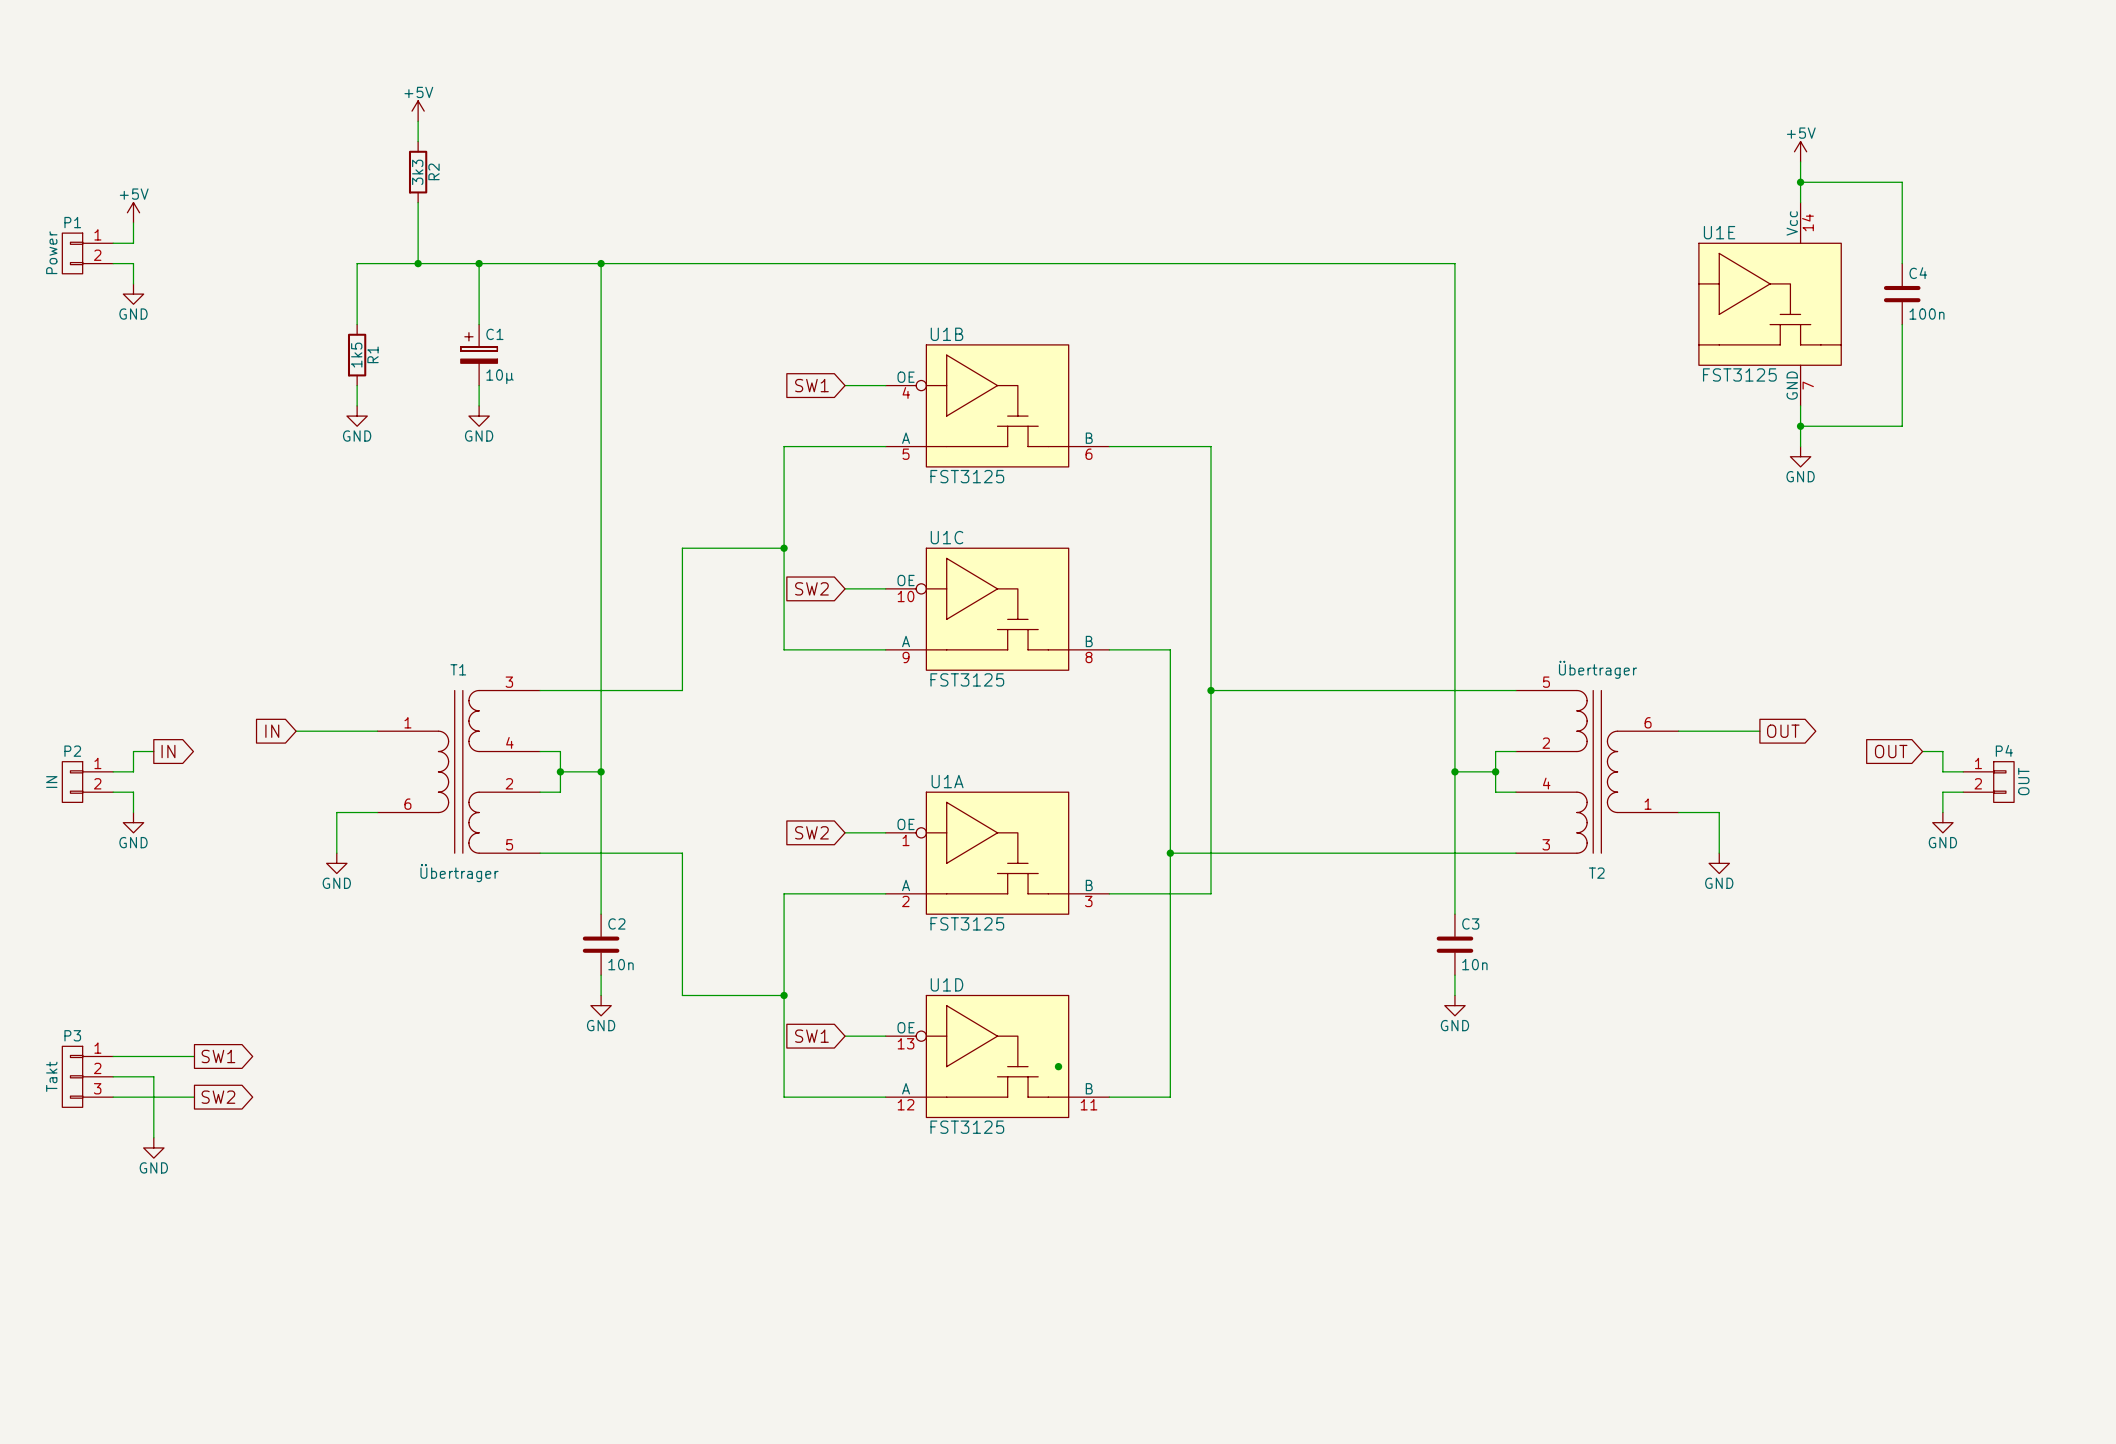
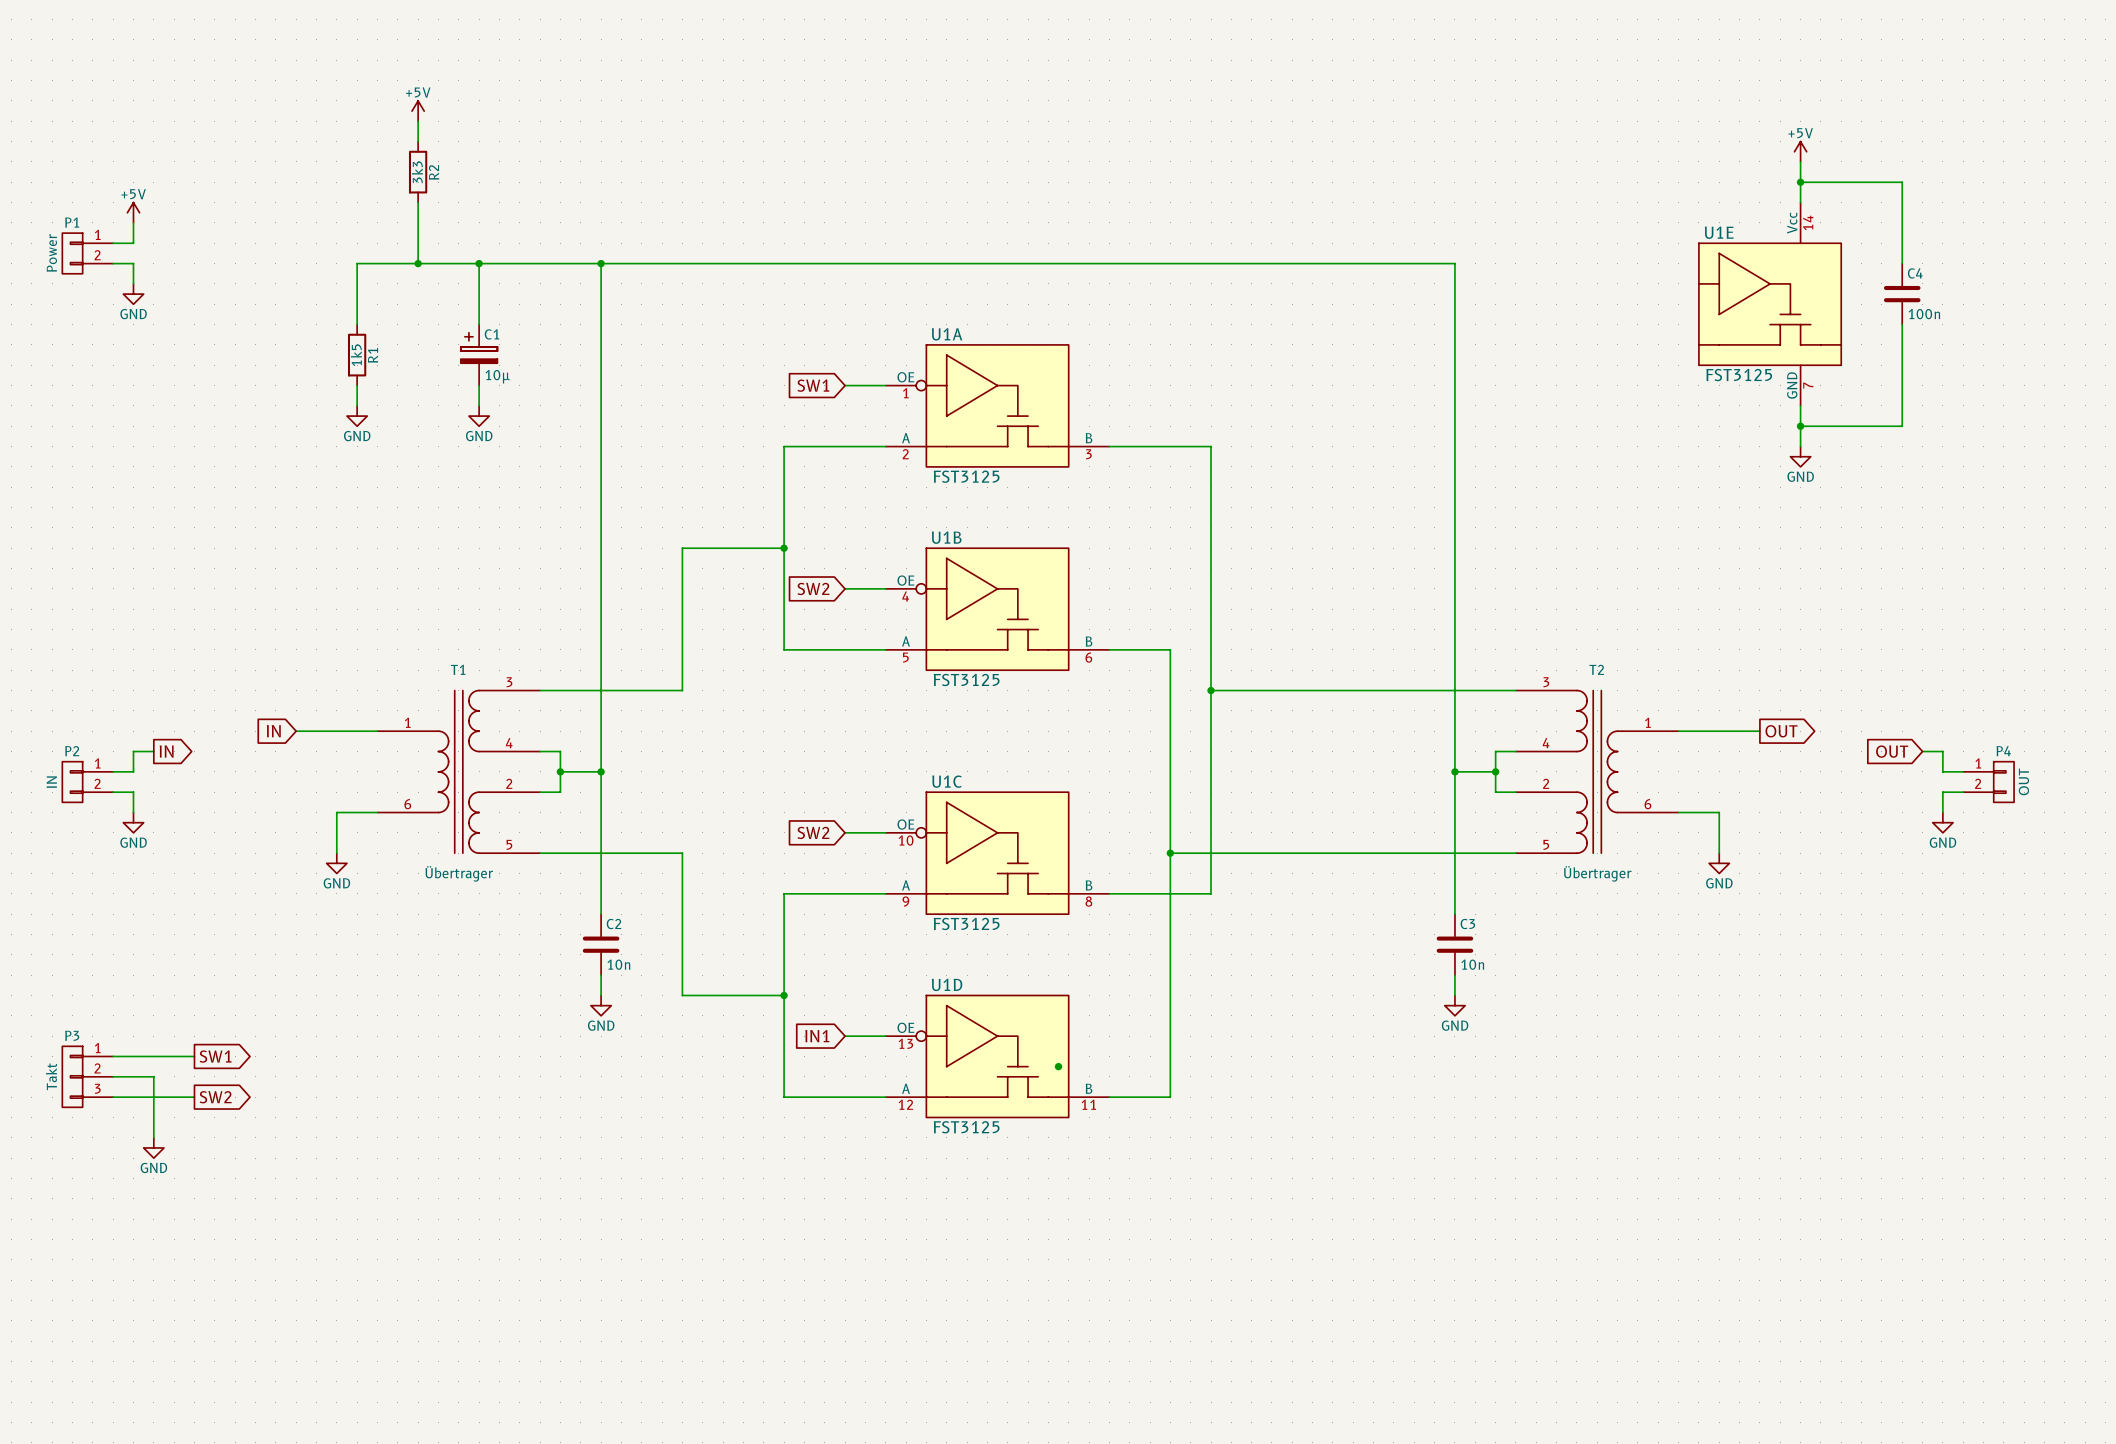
U1B position: (997, 405) -> (997, 609)
U1C position: (997, 609) -> (997, 853)
T2 flip: as is (1597, 771) -> up-down (1597, 771)
U1A position: (997, 853) -> (997, 405)
global label: SW1 (811, 1036) -> IN1 (817, 1036)

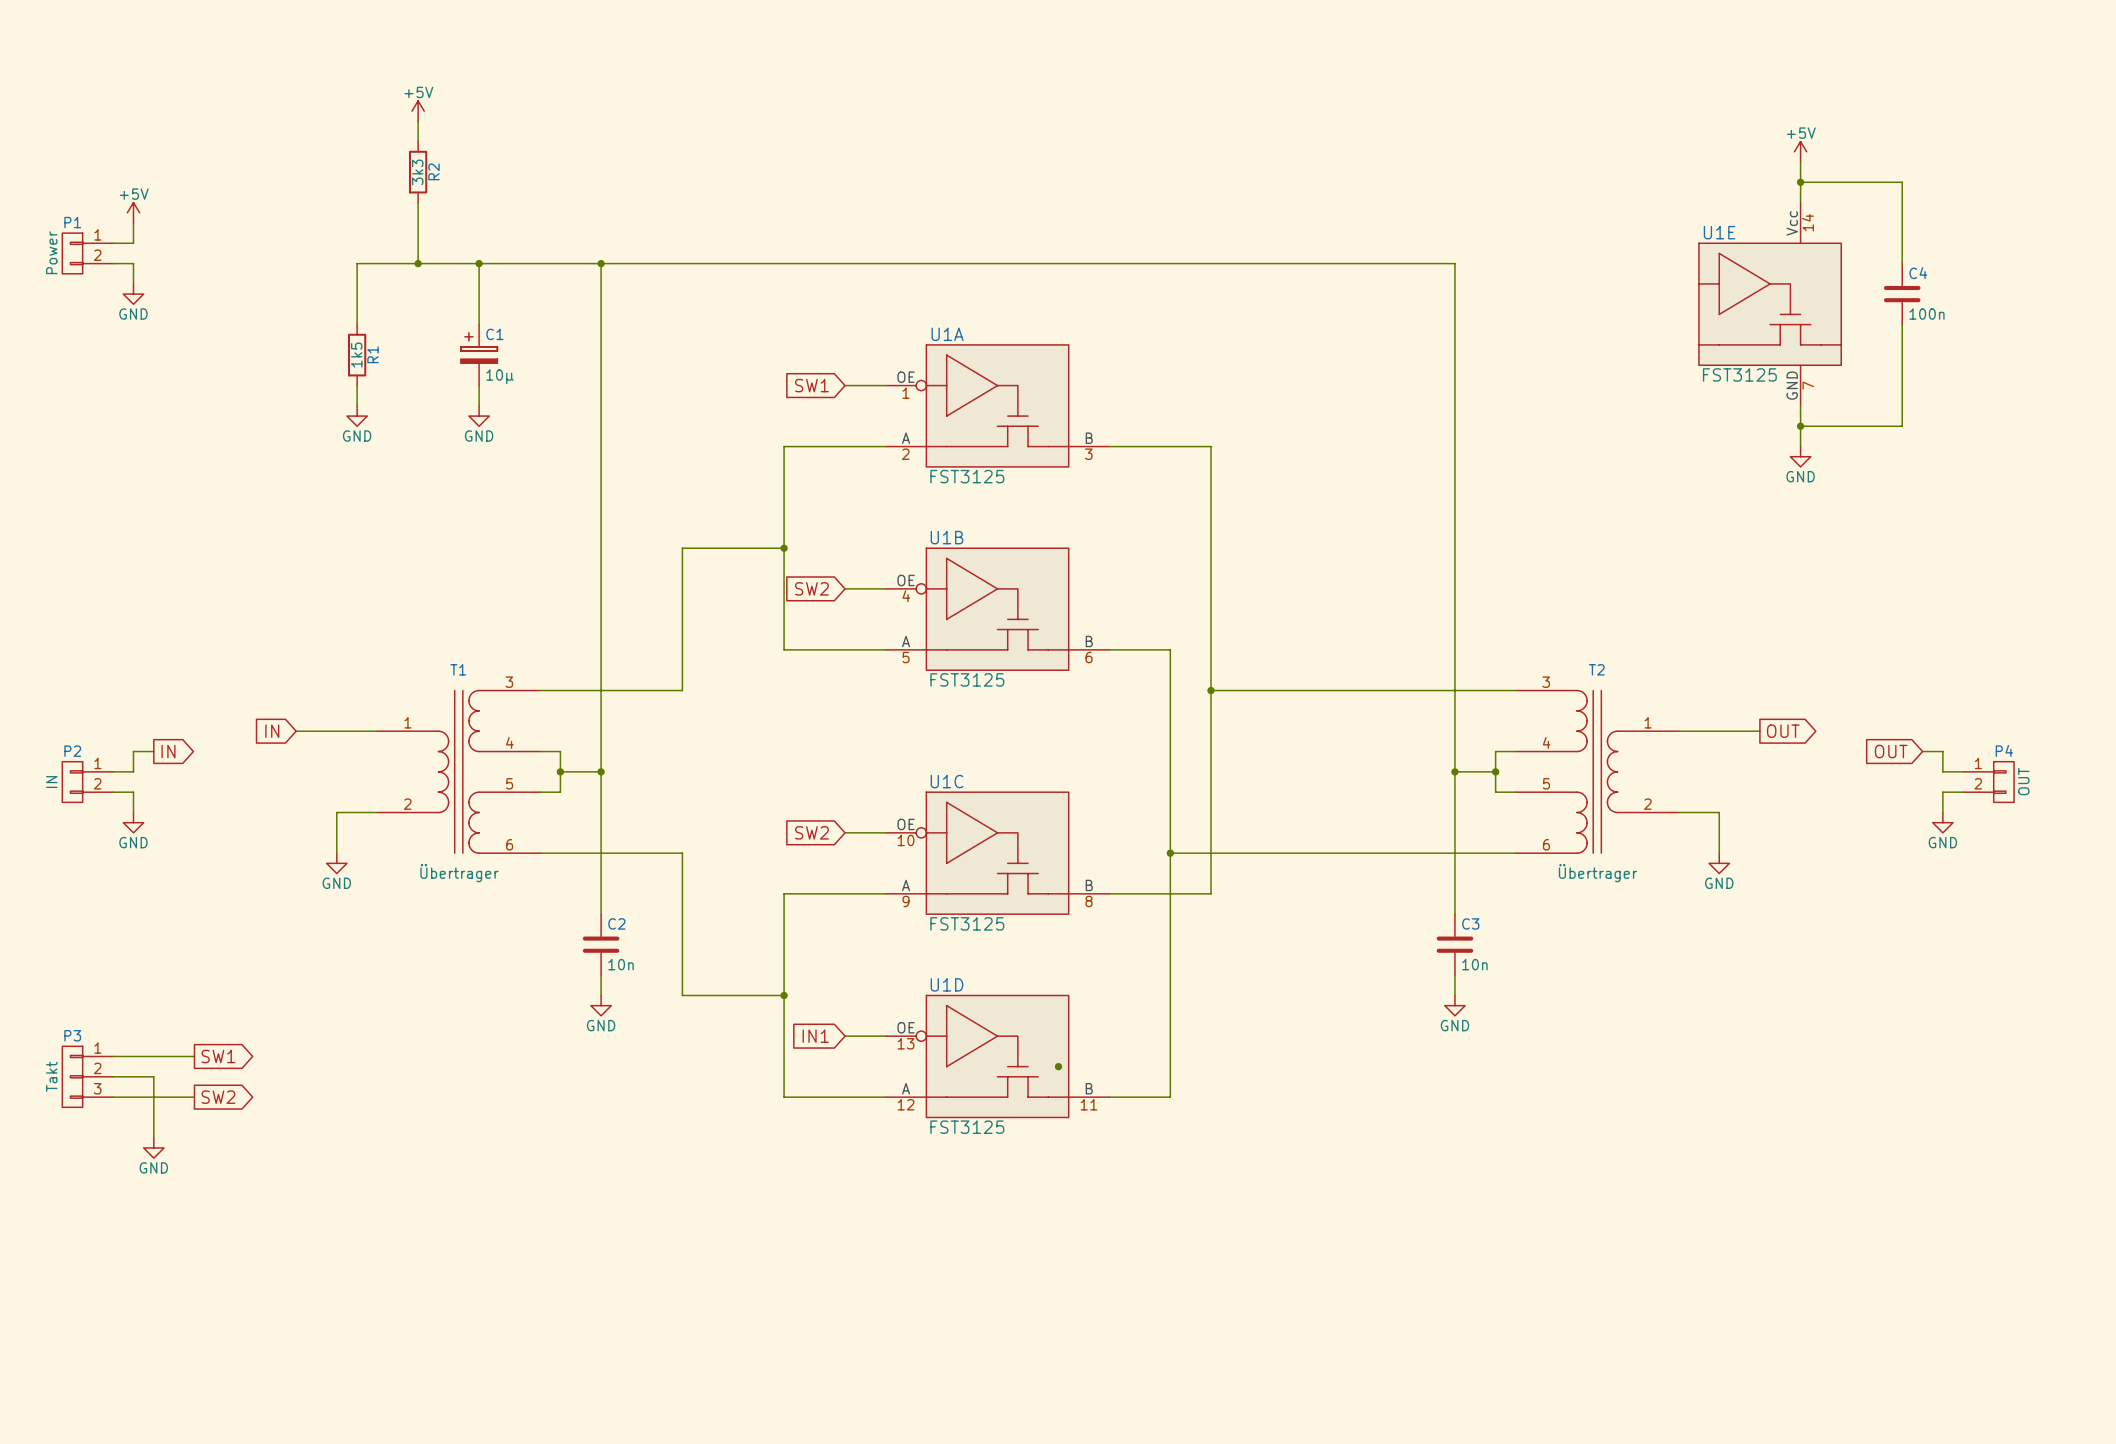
T1 pin number: 2 (509, 783) -> 5 (509, 783)
T2 pin number: 2 (1546, 783) -> 5 (1546, 783)
T1 pin number: 6 (407, 804) -> 2 (407, 804)
T2 pin number: 6 (1647, 804) -> 2 (1647, 804)
T1 pin number: 5 (509, 844) -> 6 (509, 844)
T2 pin number: 5 (1546, 844) -> 6 (1546, 844)

